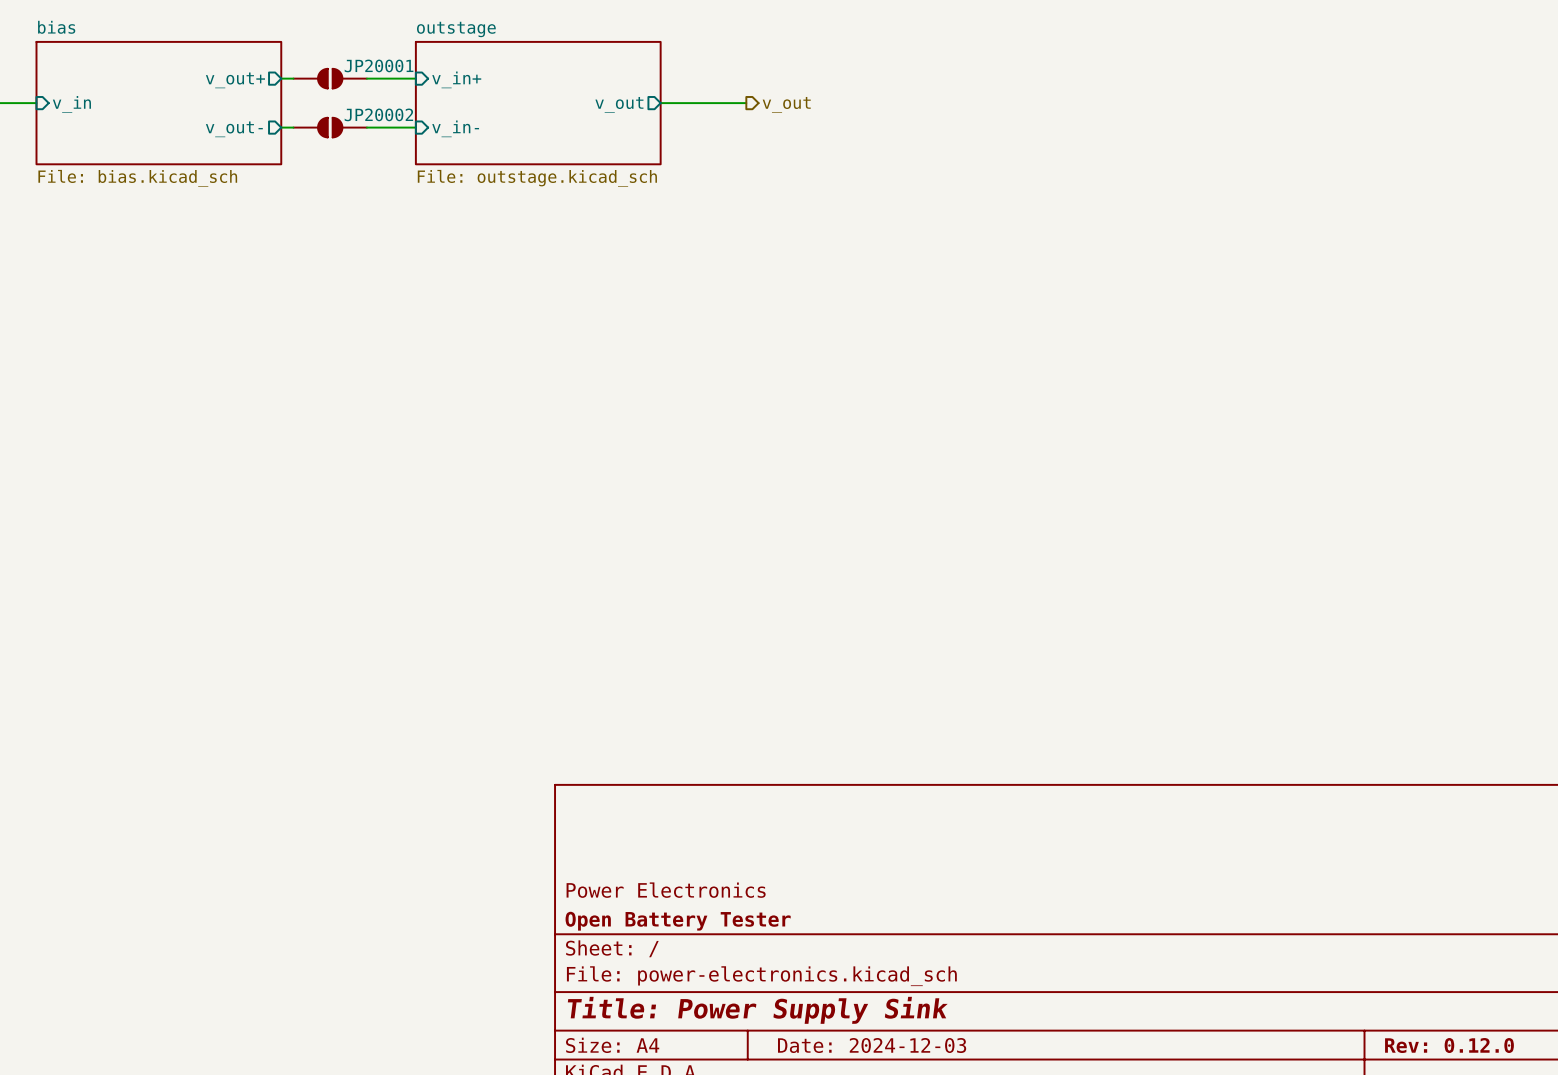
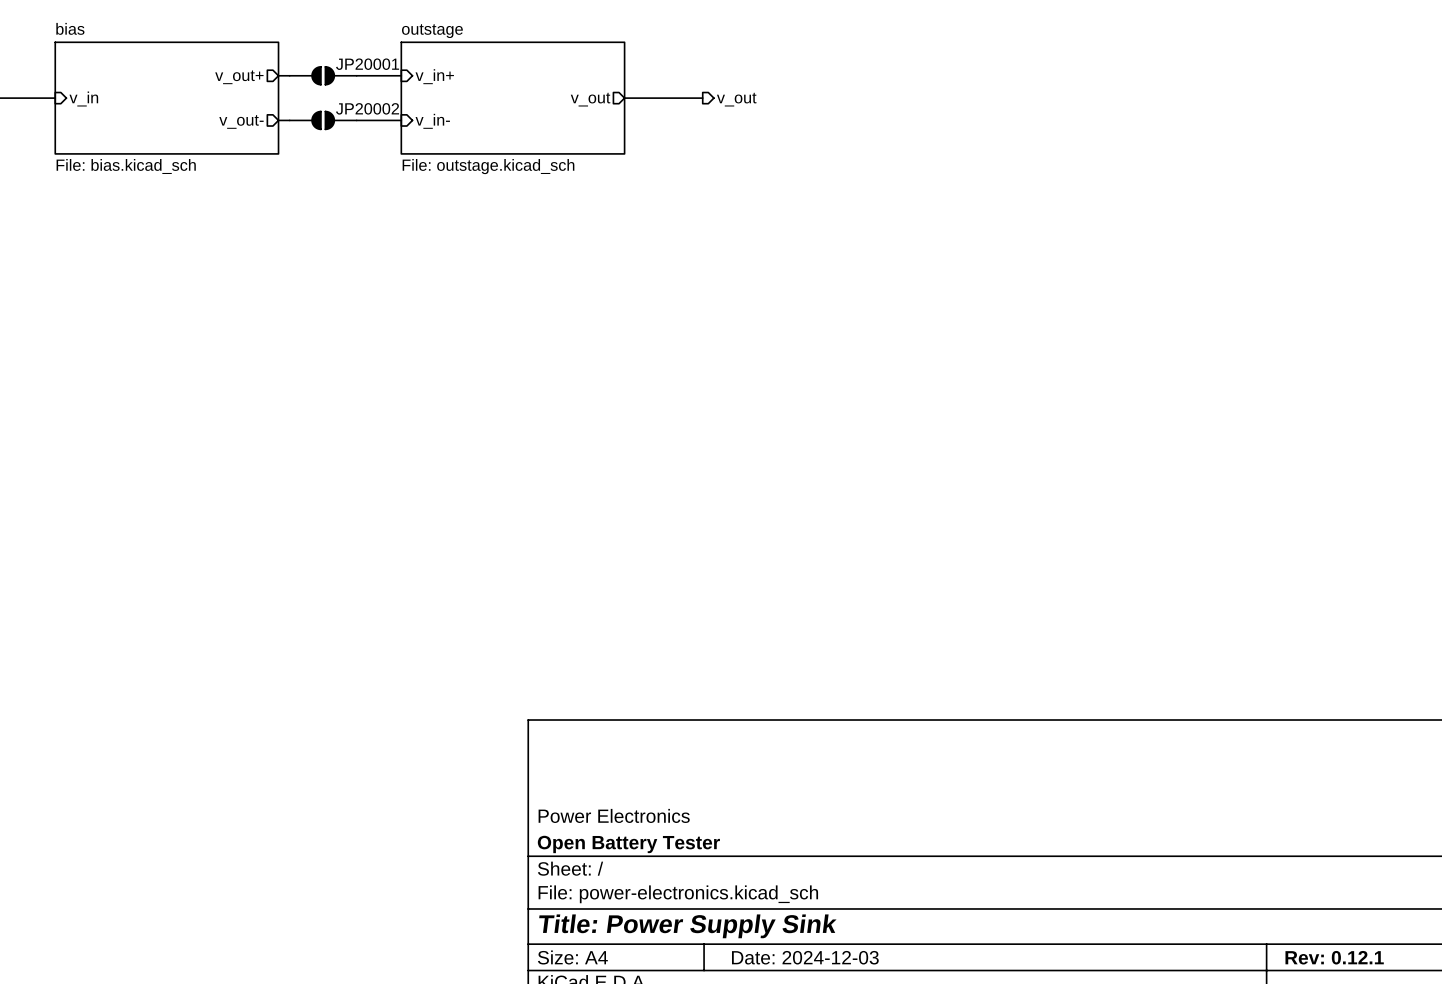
title block: Rev: 0.12.0 (1449, 1045) -> Rev: 0.12.1 (1334, 957)

